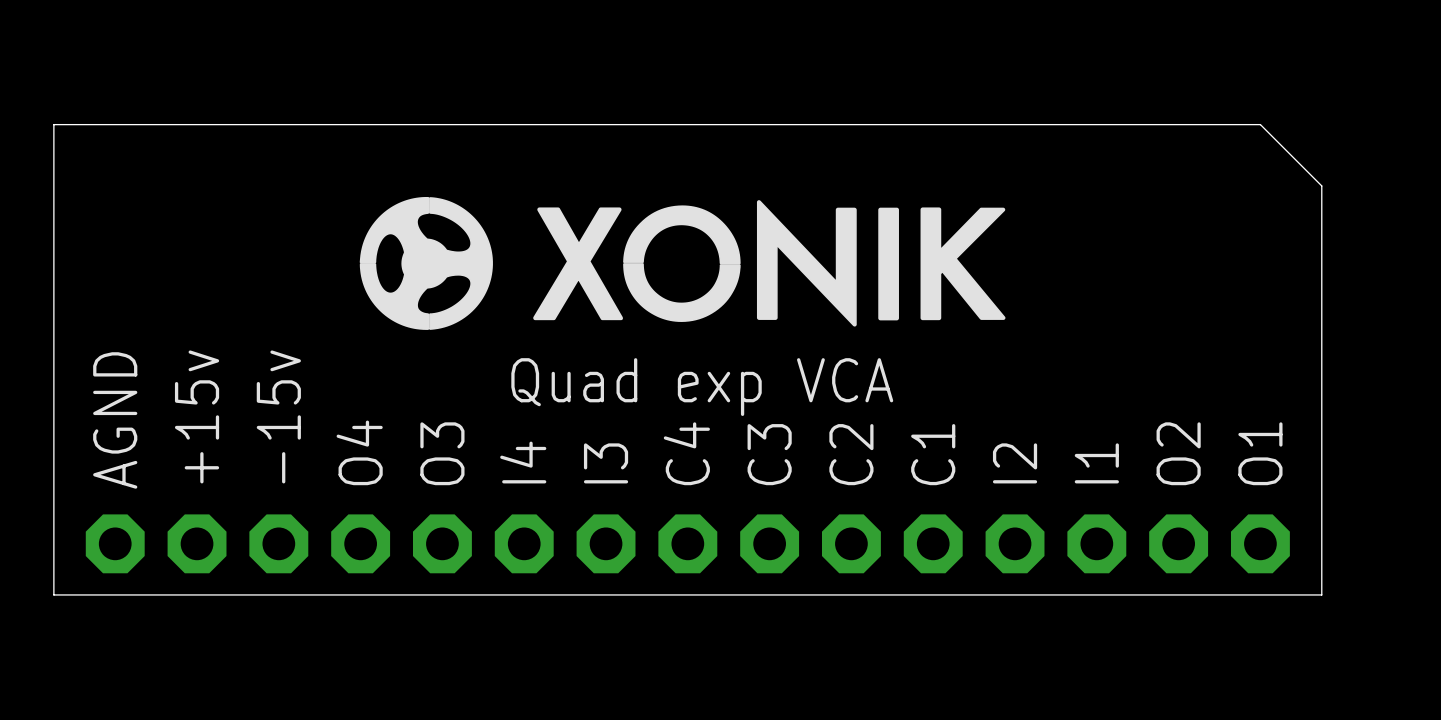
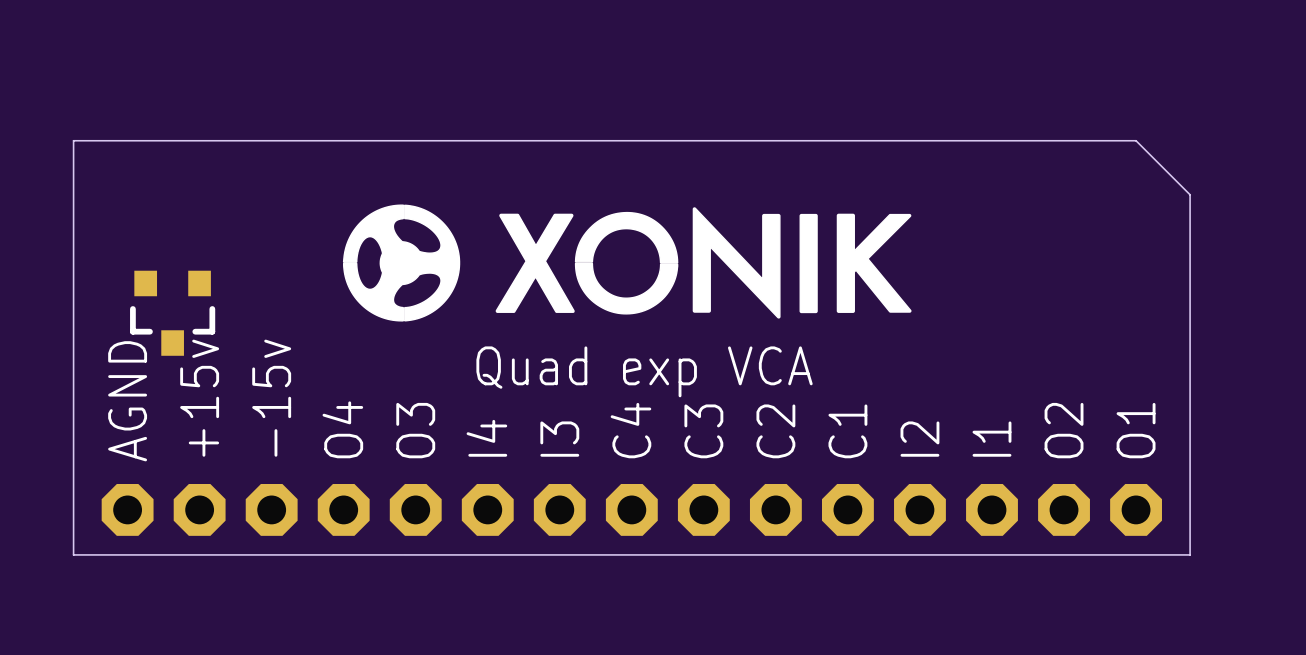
part: none -> (172, 313)

